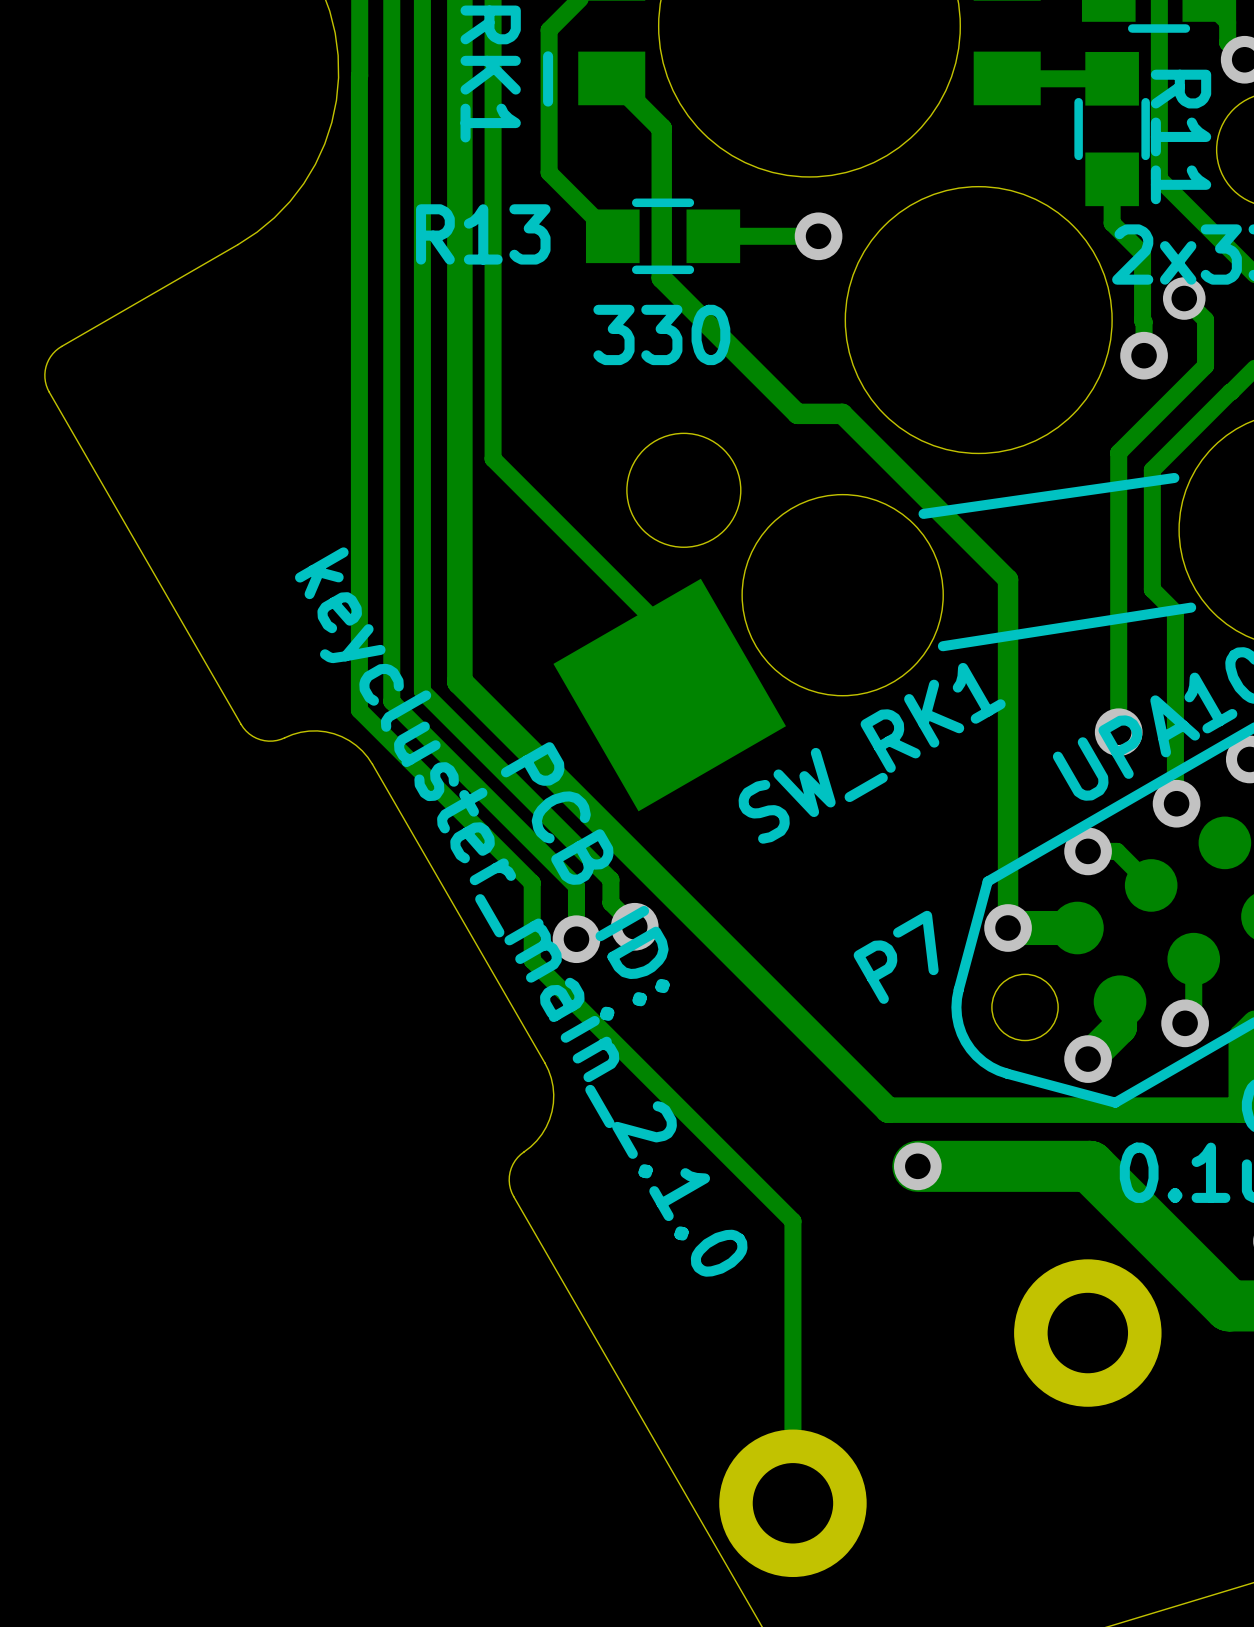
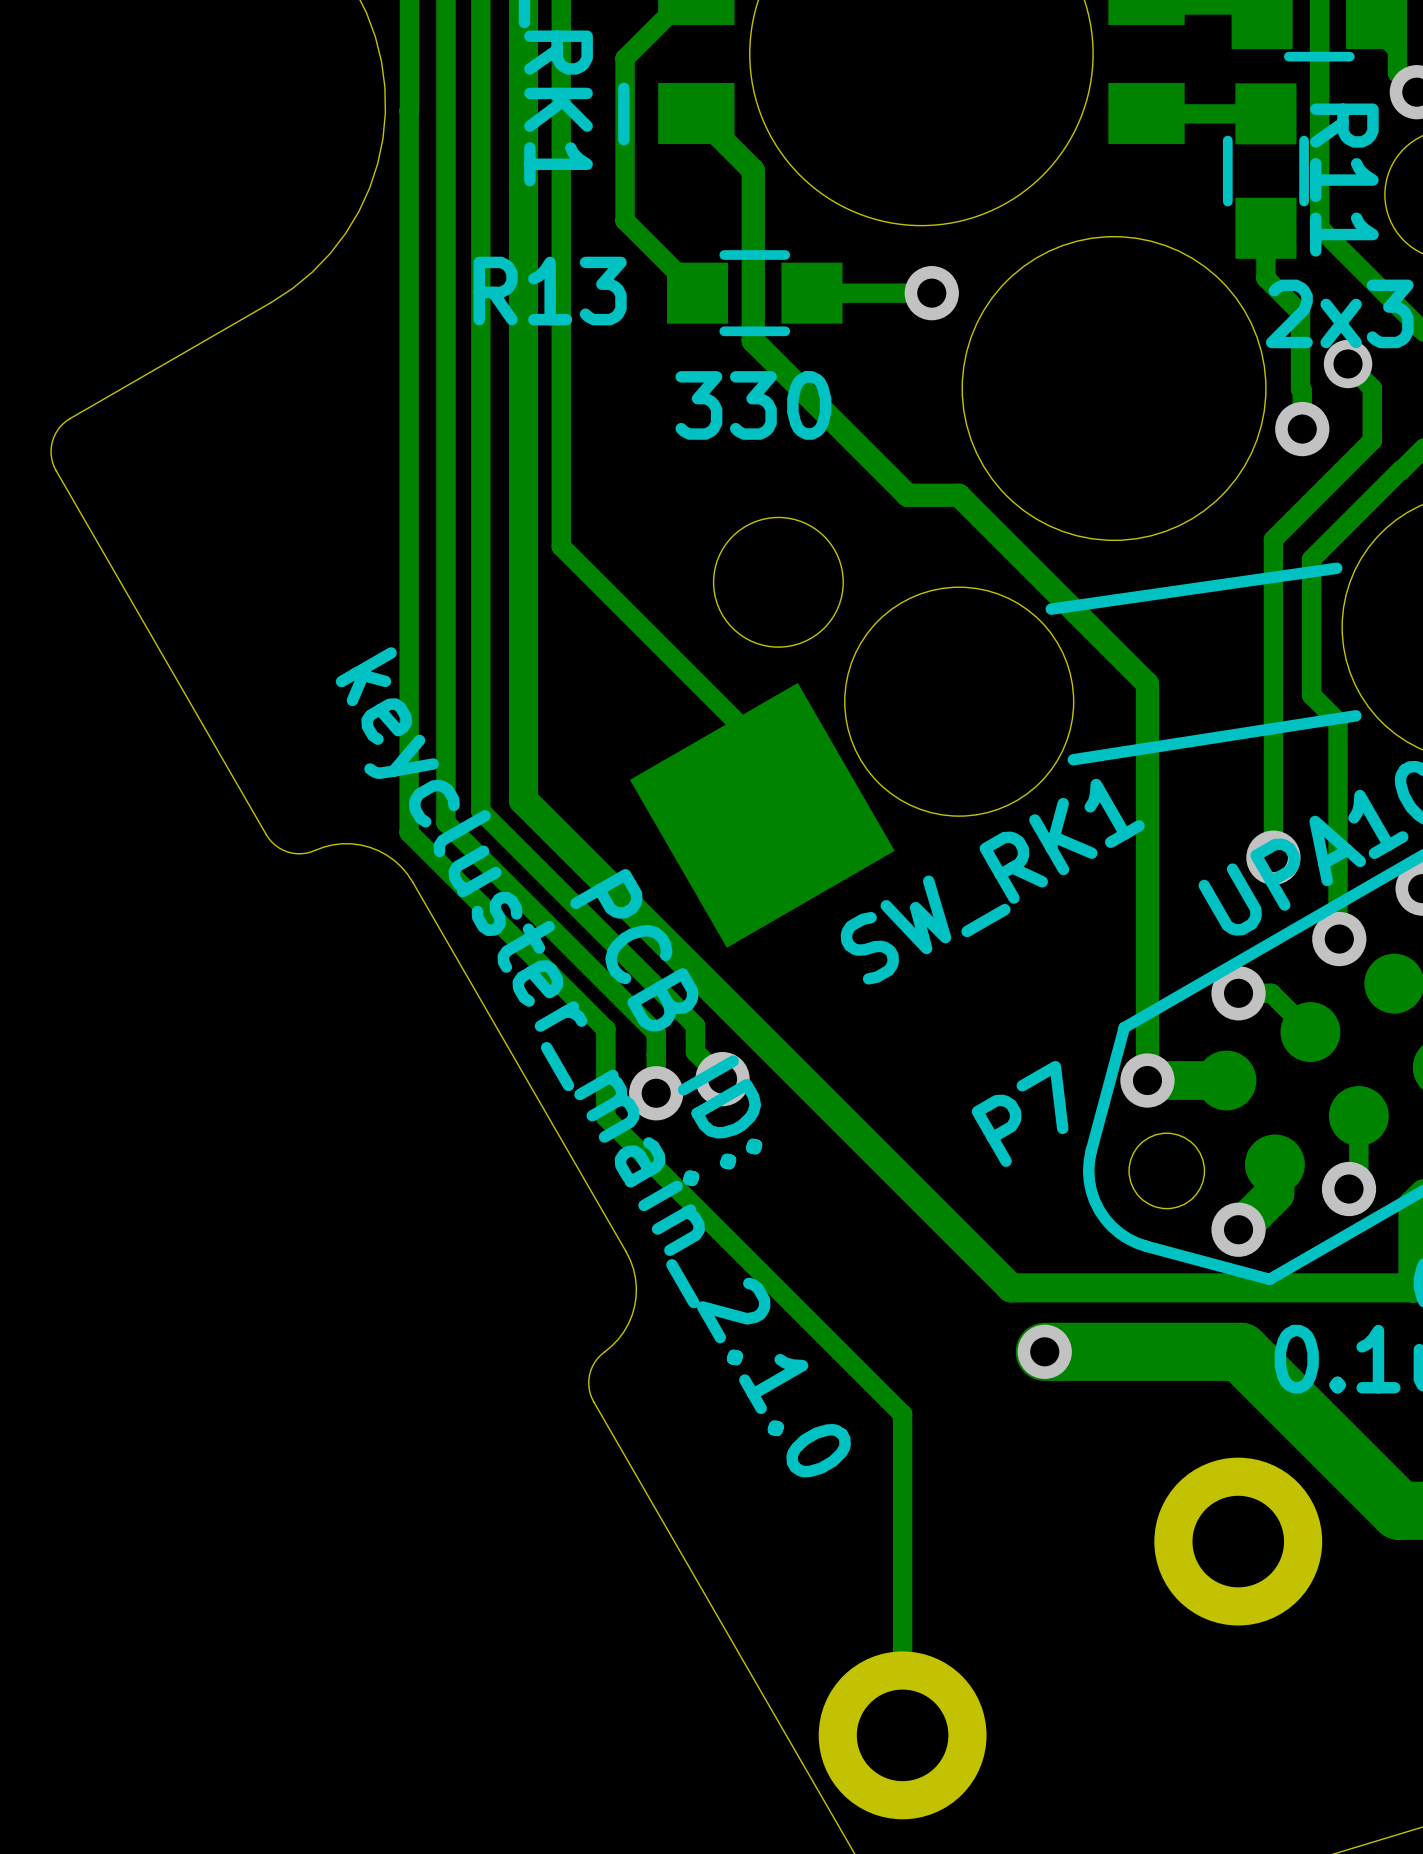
board edge: (233, 712) (243, 727) (256, 738) (272, 741) (300, 732) (325, 731) (341, 736) (356, 745) (372, 764) (544, 1062) (551, 1078) (553, 1094) (549, 1119) (536, 1140) (515, 1160) (510, 1172) (510, 1188) (521, 1210) -> (266, 834) (279, 848) (296, 853) (342, 843) (369, 847) (394, 860) (412, 881) (626, 1251) (633, 1269) (636, 1287) (632, 1315) (618, 1339) (601, 1354) (592, 1366) (588, 1384) (593, 1401)

